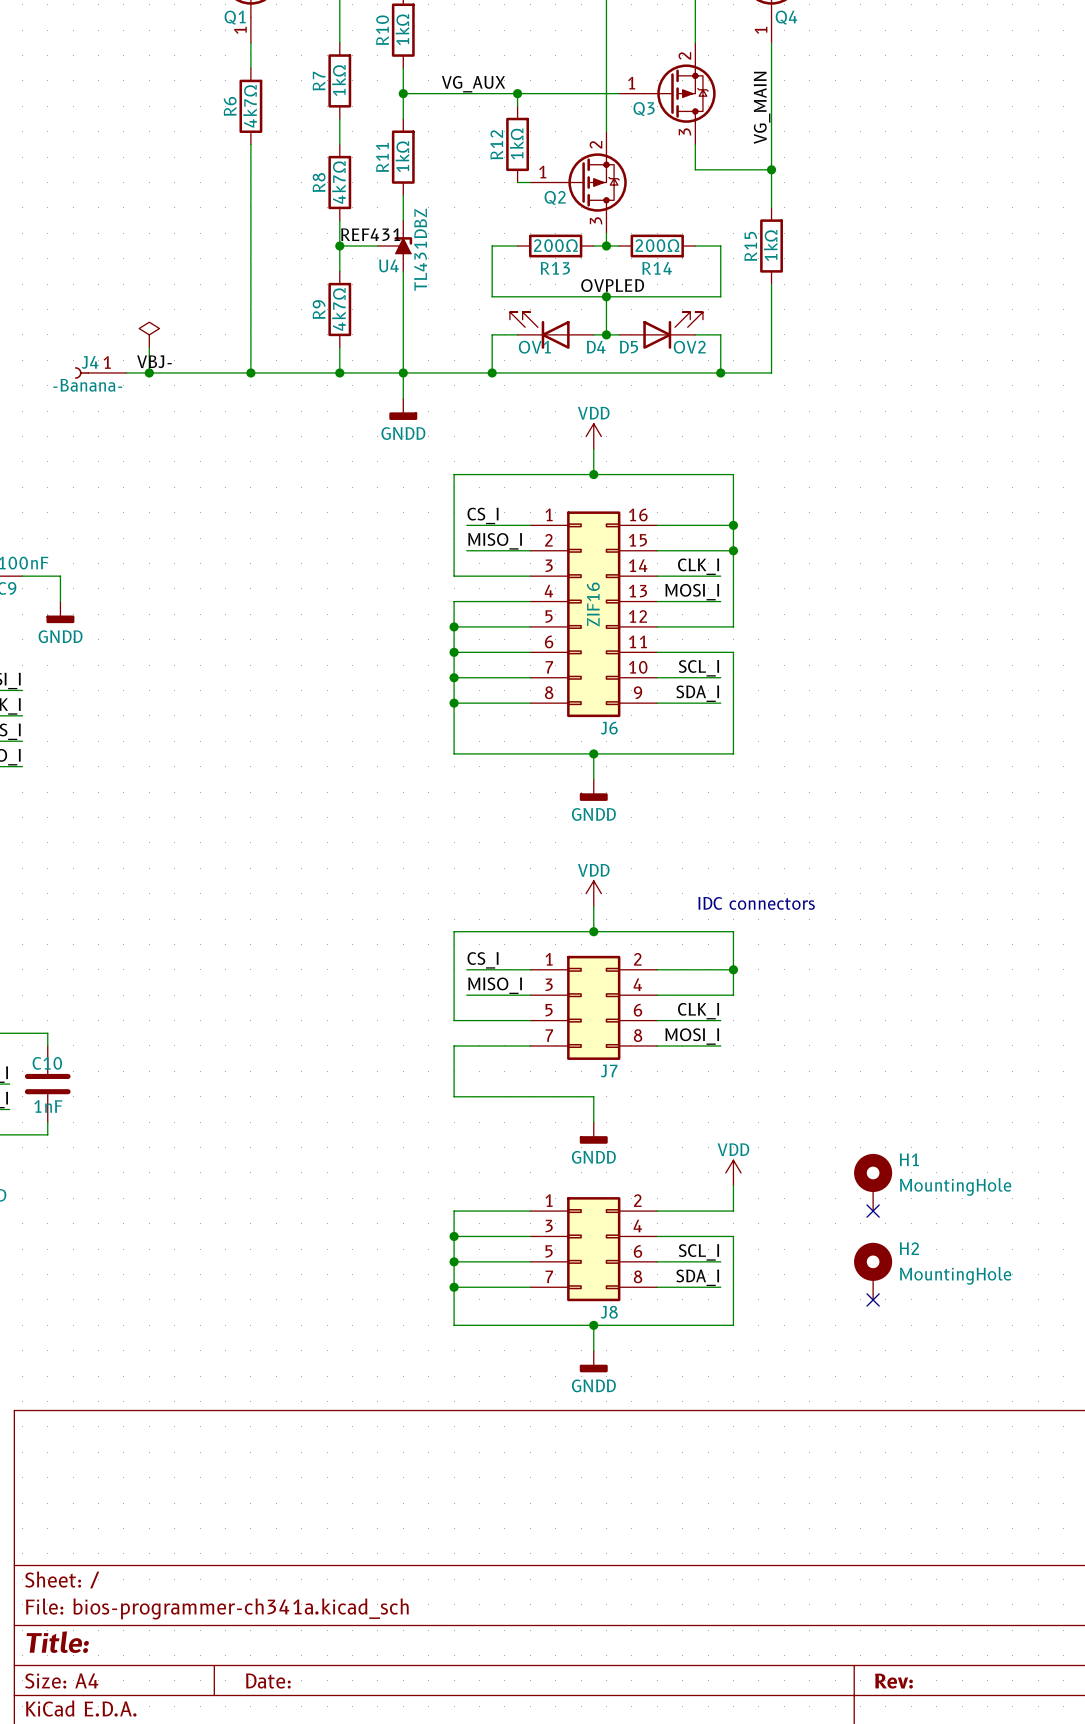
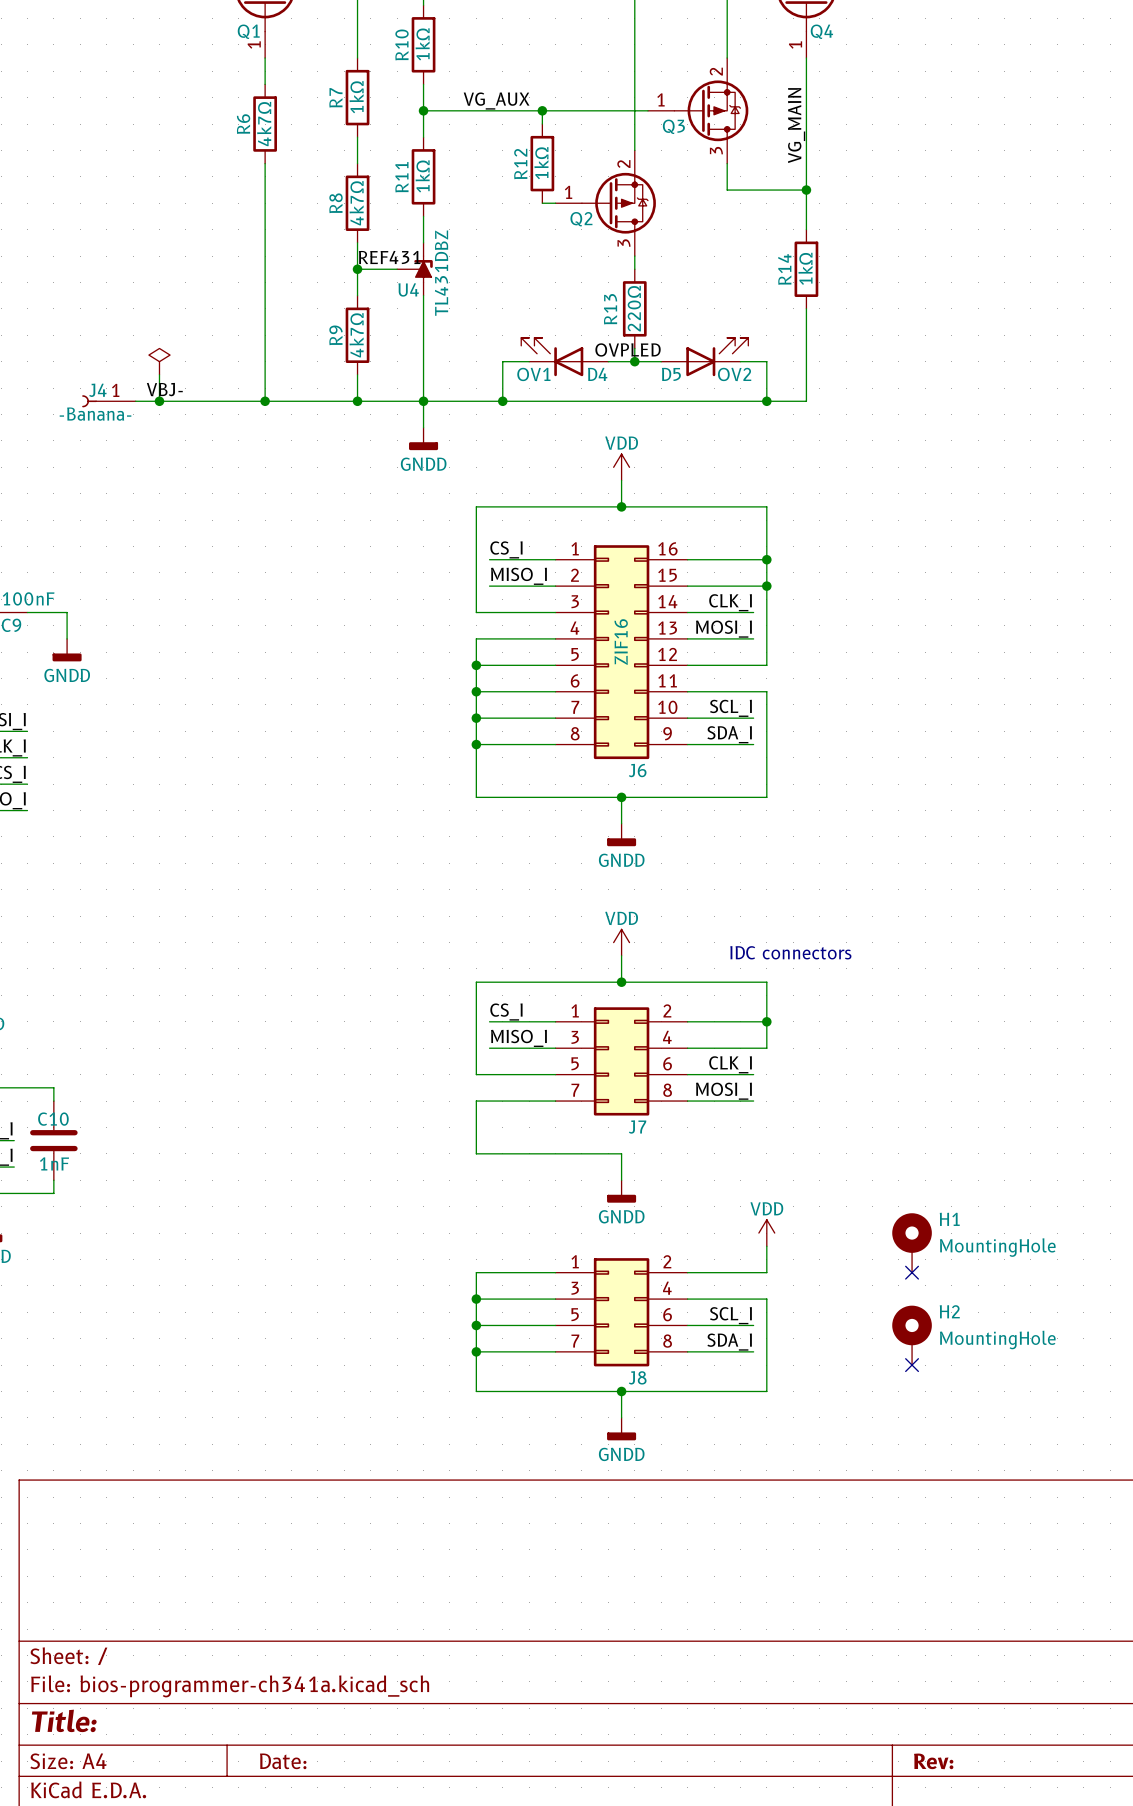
R13 value: 200Ω (555, 245) -> 220Ω (634, 308)
wire: (517, 246) (492, 246) (492, 296) (720, 296) (720, 246) (695, 246) -> none
R13 rotation: 0° (555, 246) -> 90° clockwise (634, 308)
R13 position: (555, 246) -> (634, 308)
wire: (593, 246) (619, 246) -> none
junction: (606, 246) -> none
R14: 200Ω (657, 246) -> none
R15 name: R15 (750, 246) -> R14 (784, 269)
label position: OVPLED (612, 285) -> OVPLED (628, 349)
junction: (606, 296) -> none
D4 position: (551, 330) -> (564, 357)
D5 position: (661, 330) -> (704, 357)
wire: (492, 334) (492, 372) -> (515, 361) (502, 361) (502, 401)
wire: (720, 334) (720, 372) -> (753, 361) (766, 361) (766, 401)
D4 value position: OV1 (534, 347) -> OV1 (533, 374)
D4 name position: D4 (596, 347) -> D4 (597, 374)
junction position: (492, 372) -> (502, 401)
junction position: (720, 372) -> (766, 401)

